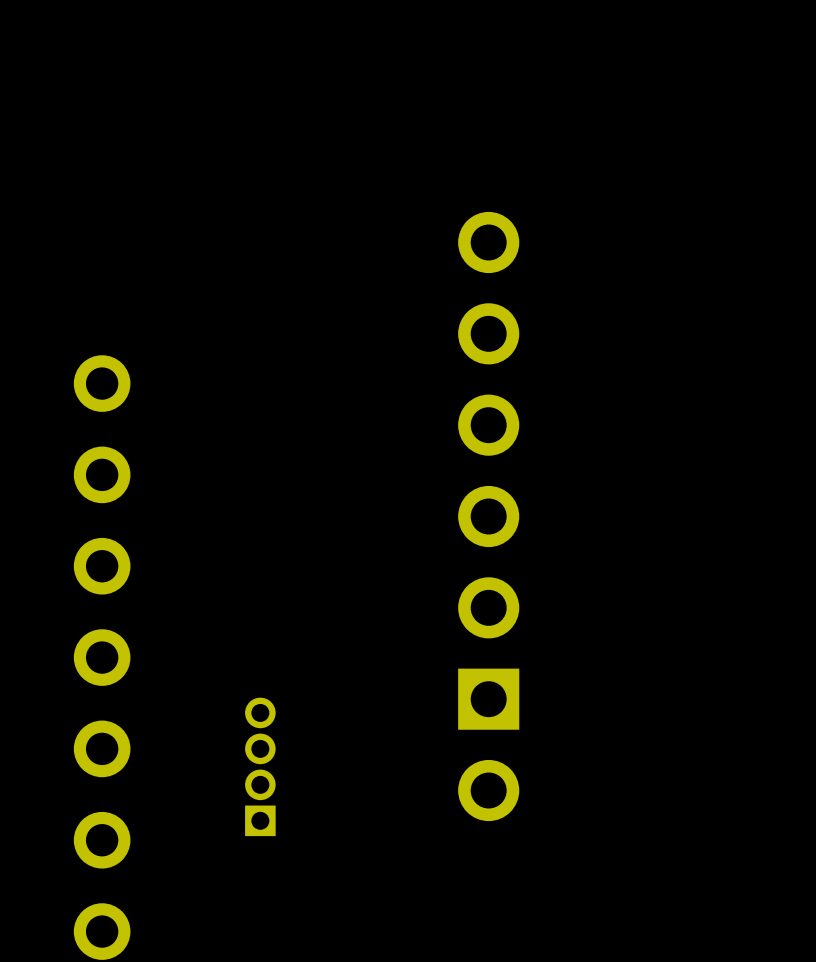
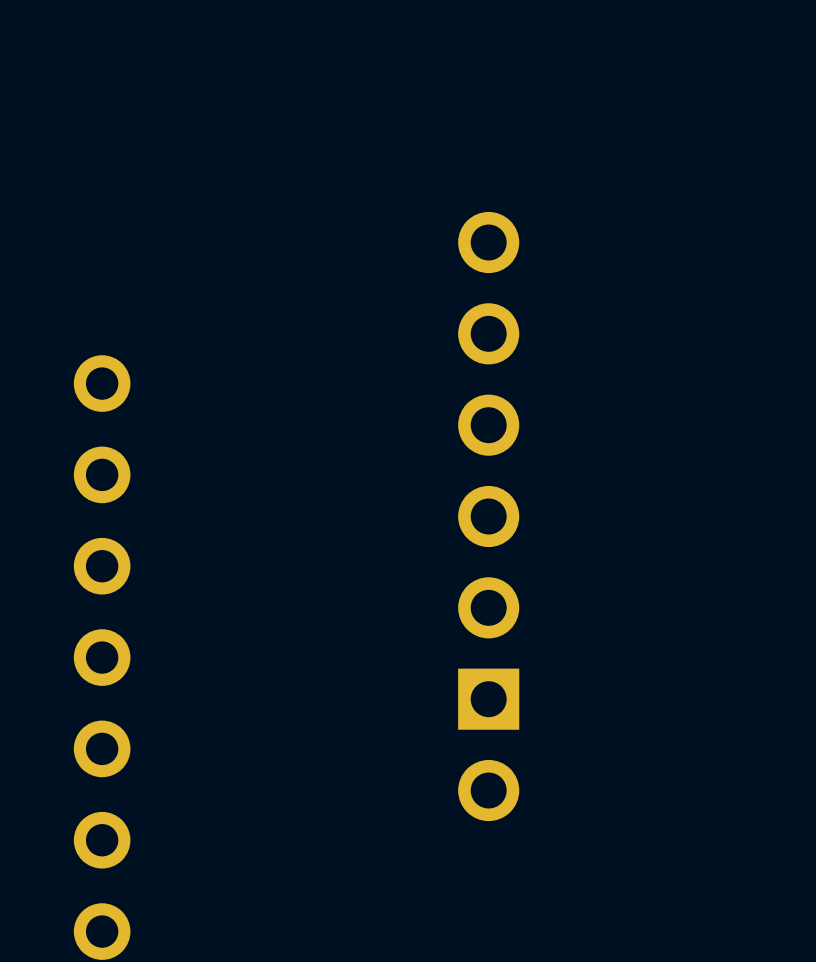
part: (260, 766) -> none

